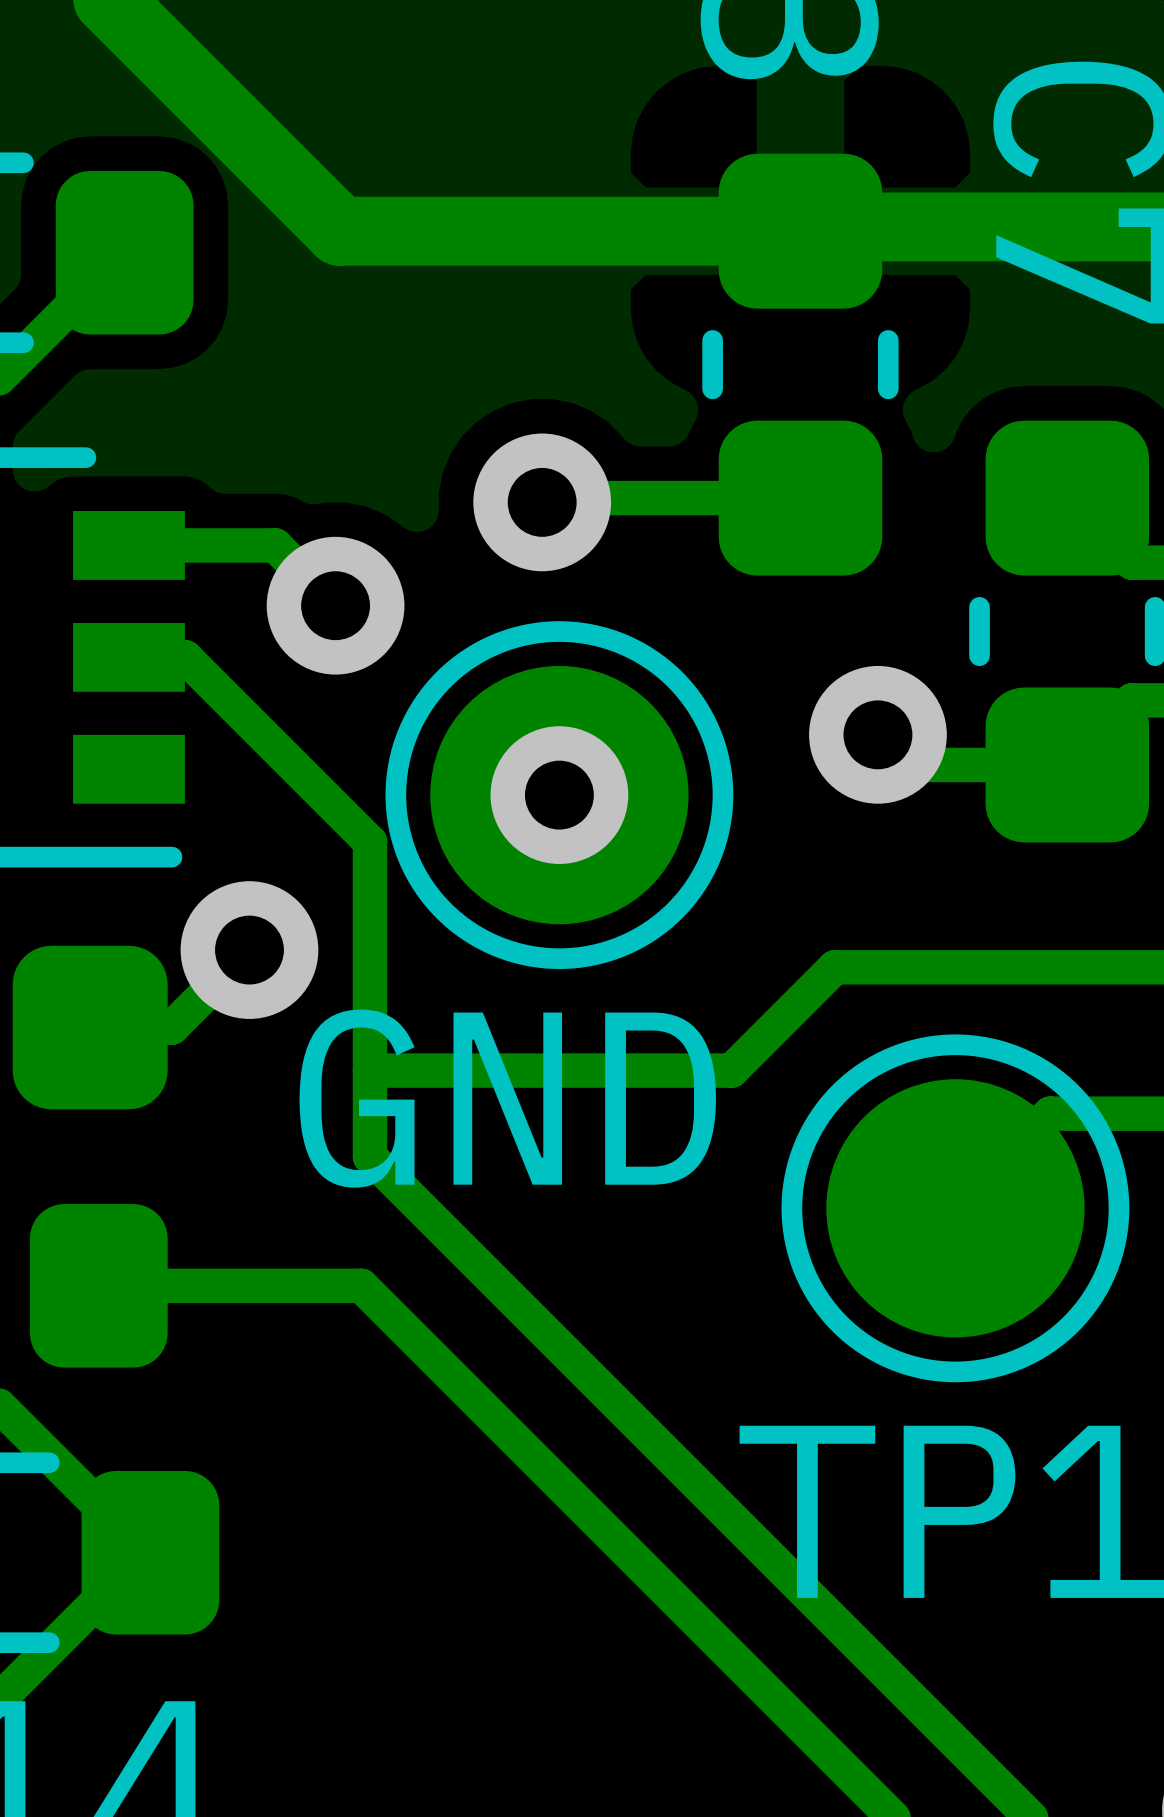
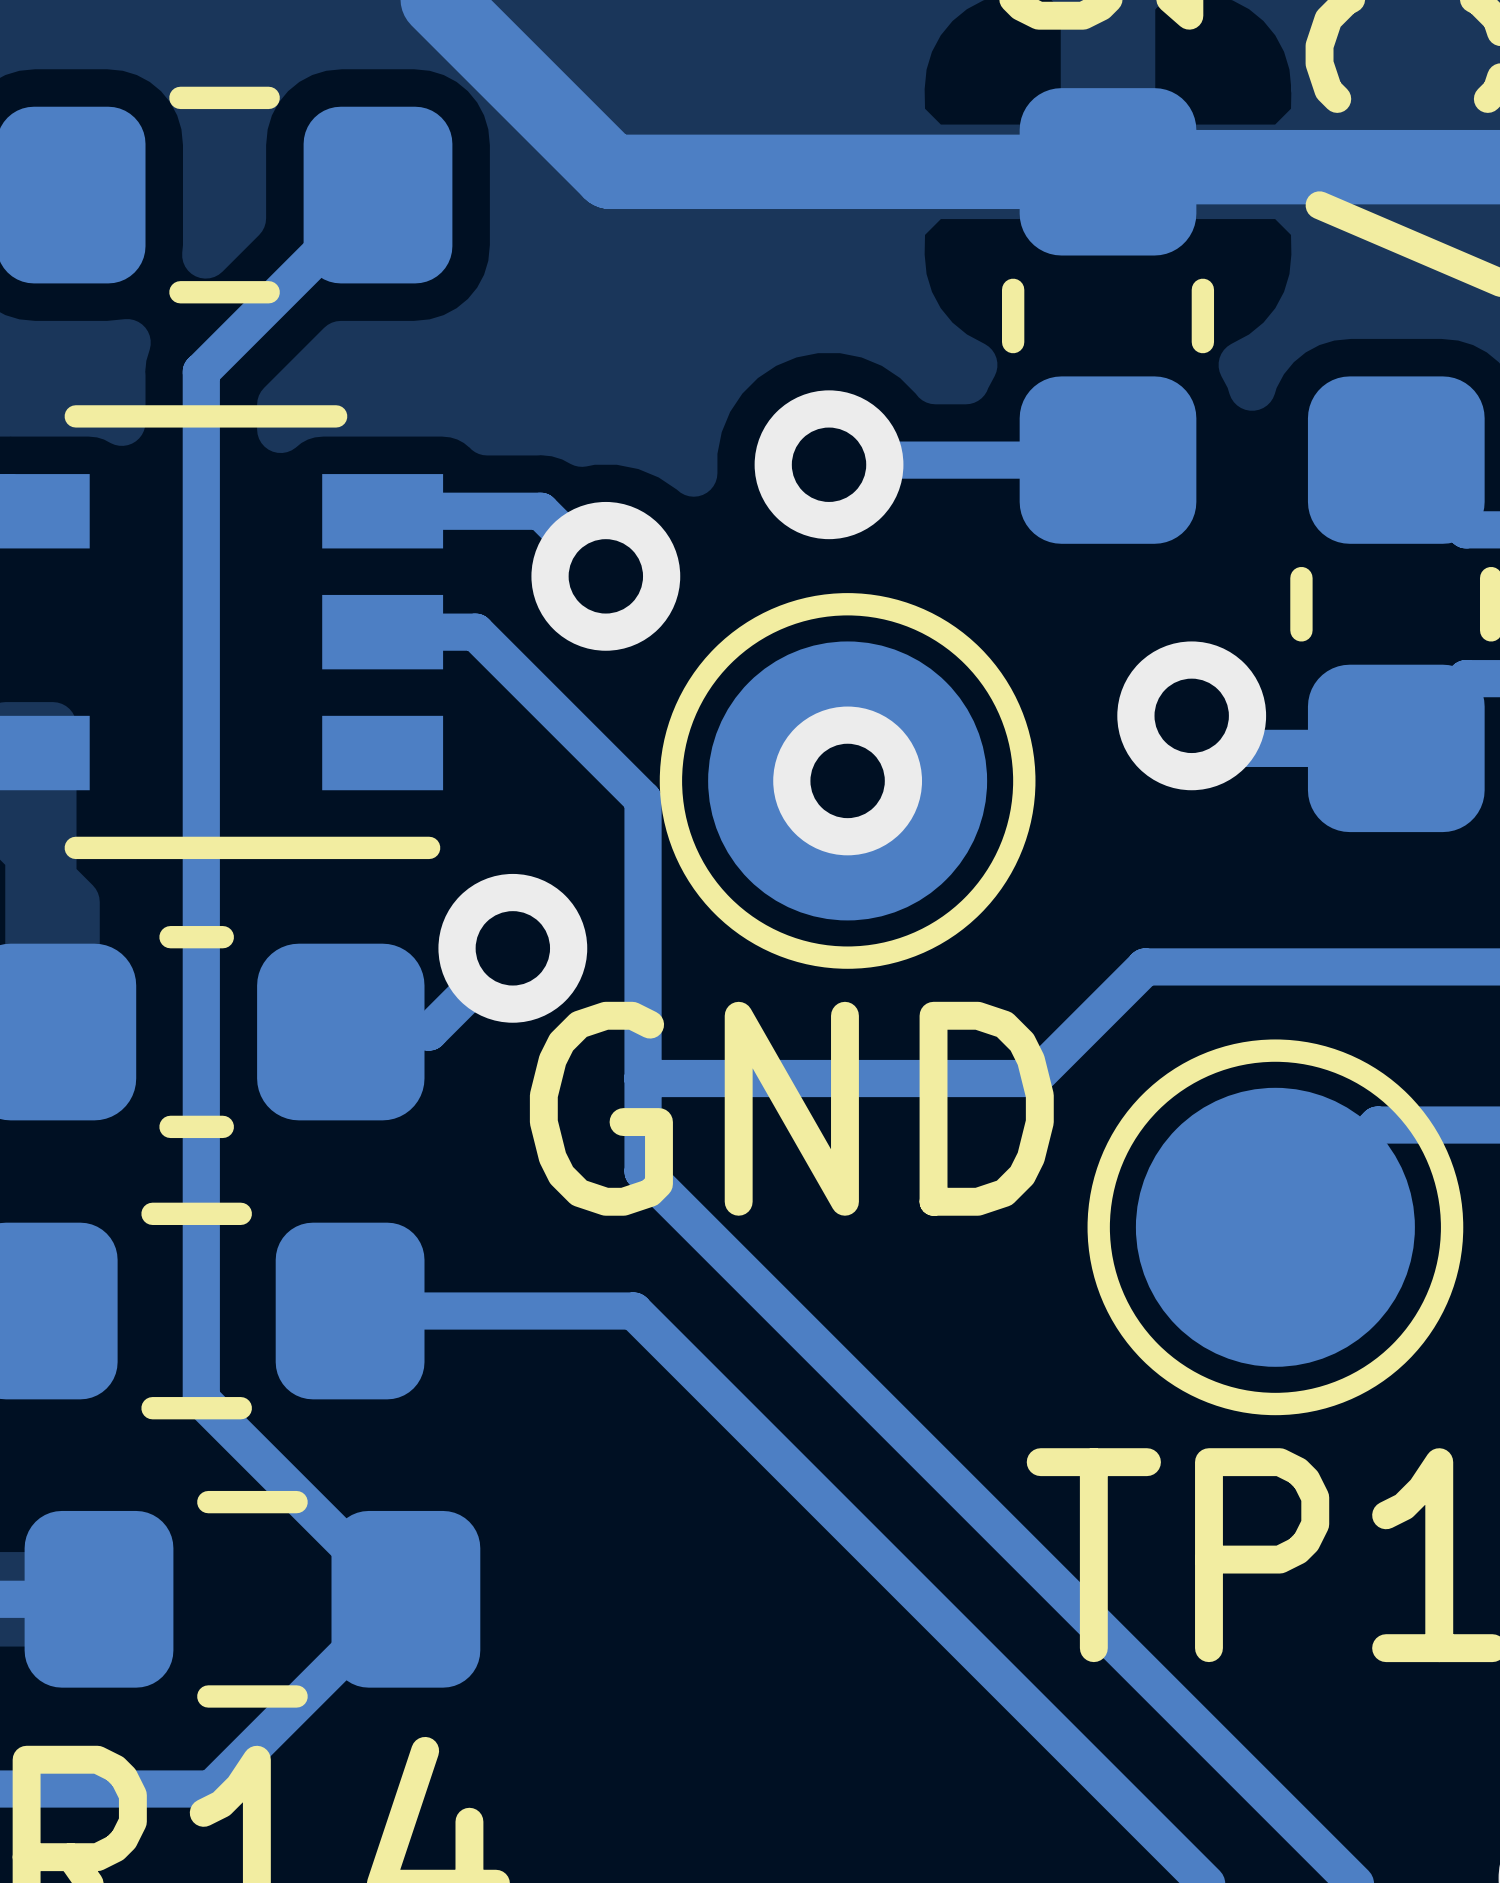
track: (185, 657) (370, 841) -> (443, 632) (475, 632) (643, 799) (643, 831)

